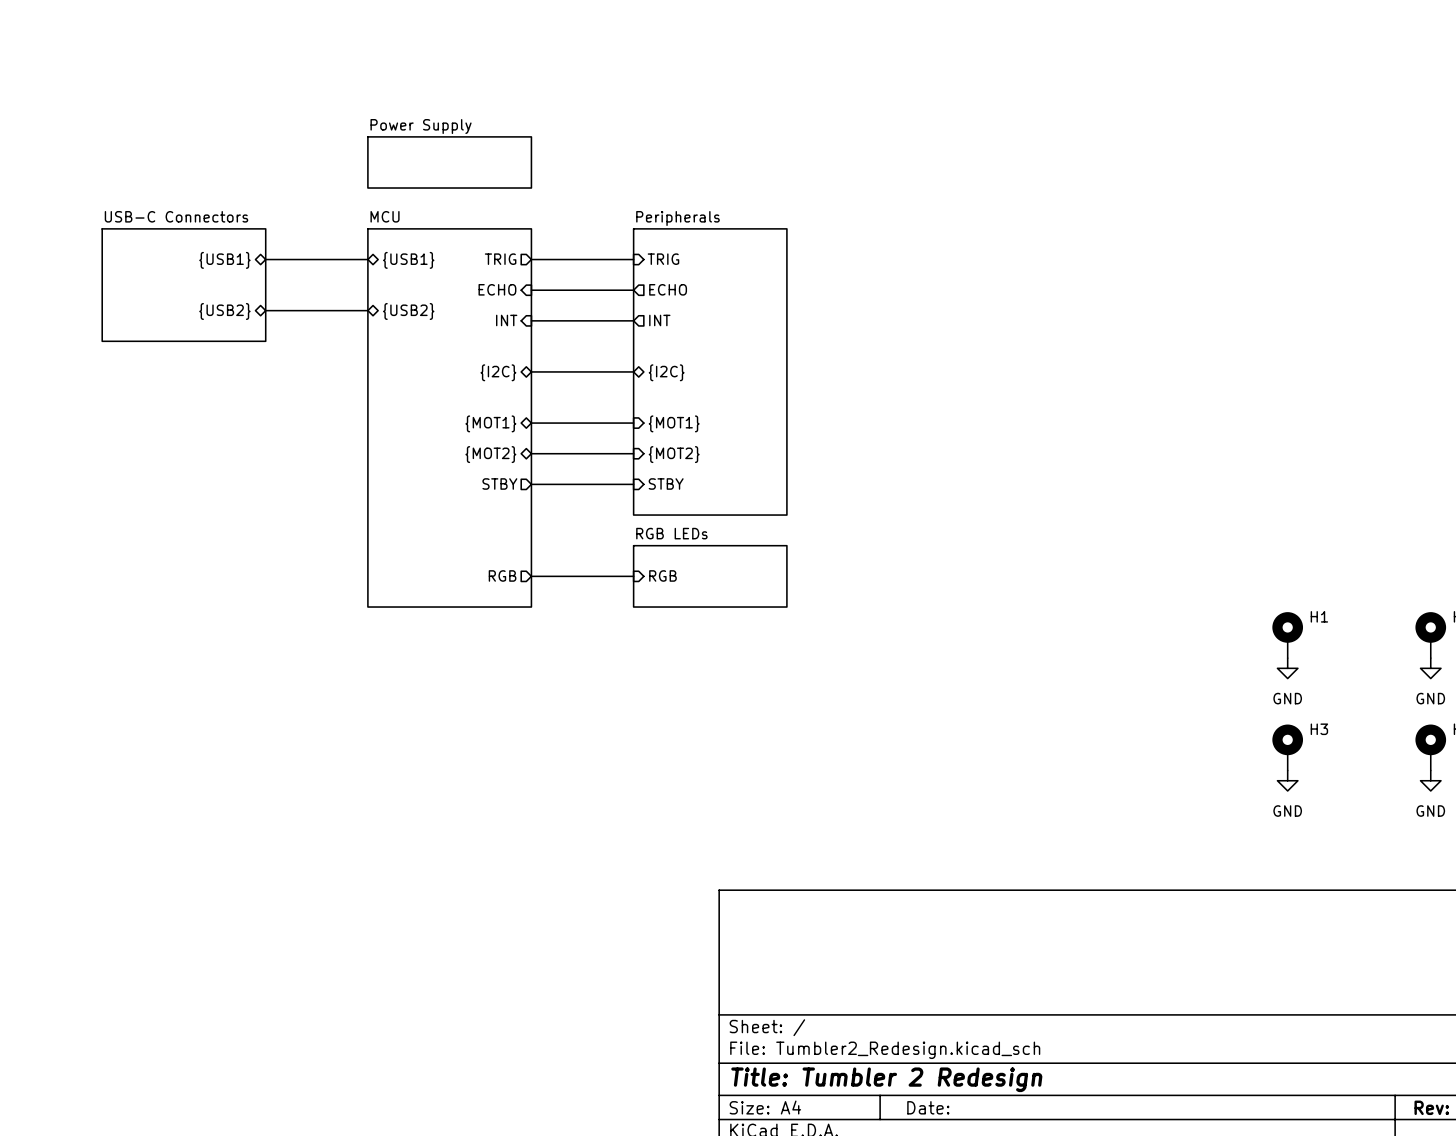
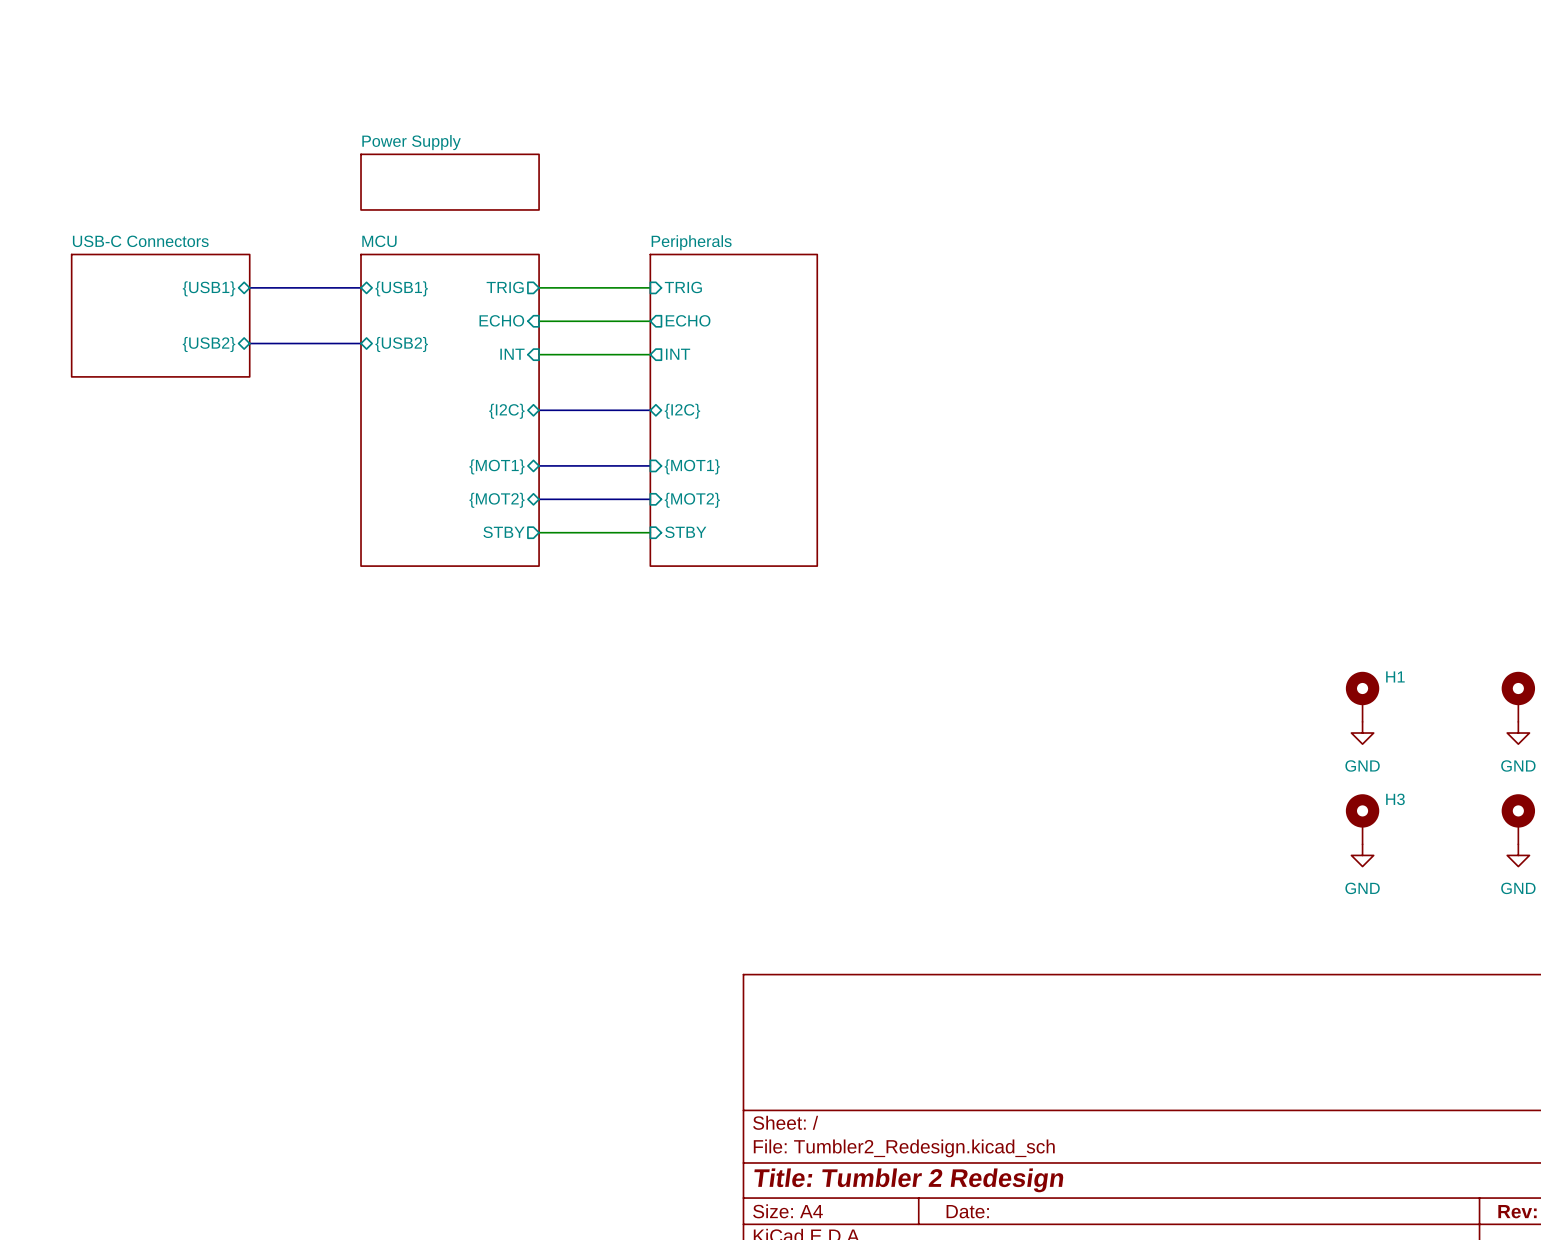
sheet MCU: none -> (450, 410)
sheet MCU: (449, 417) -> none
sheet pin: RGB (502, 575) -> none
sheet pin: RGB (662, 575) -> none
wire: (531, 576) (633, 576) -> none
sheet RGB LEDs: (710, 576) -> none

